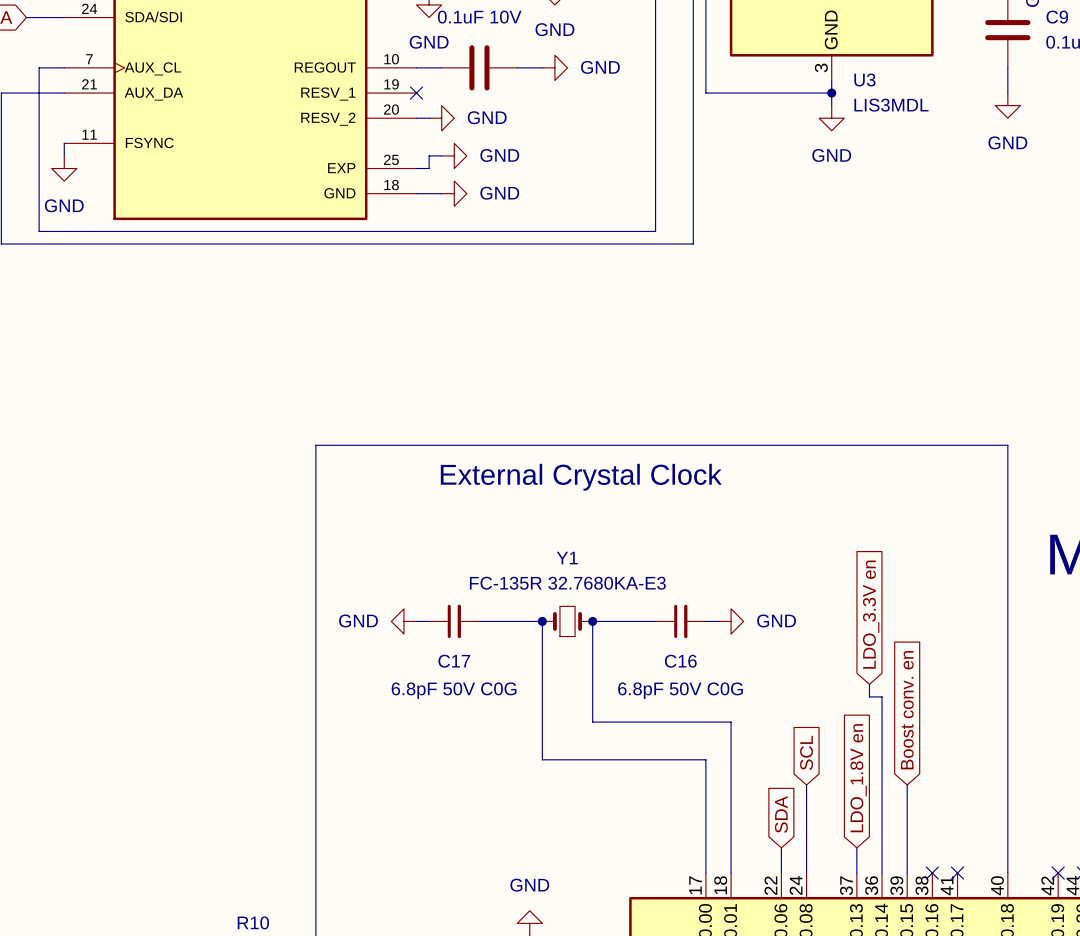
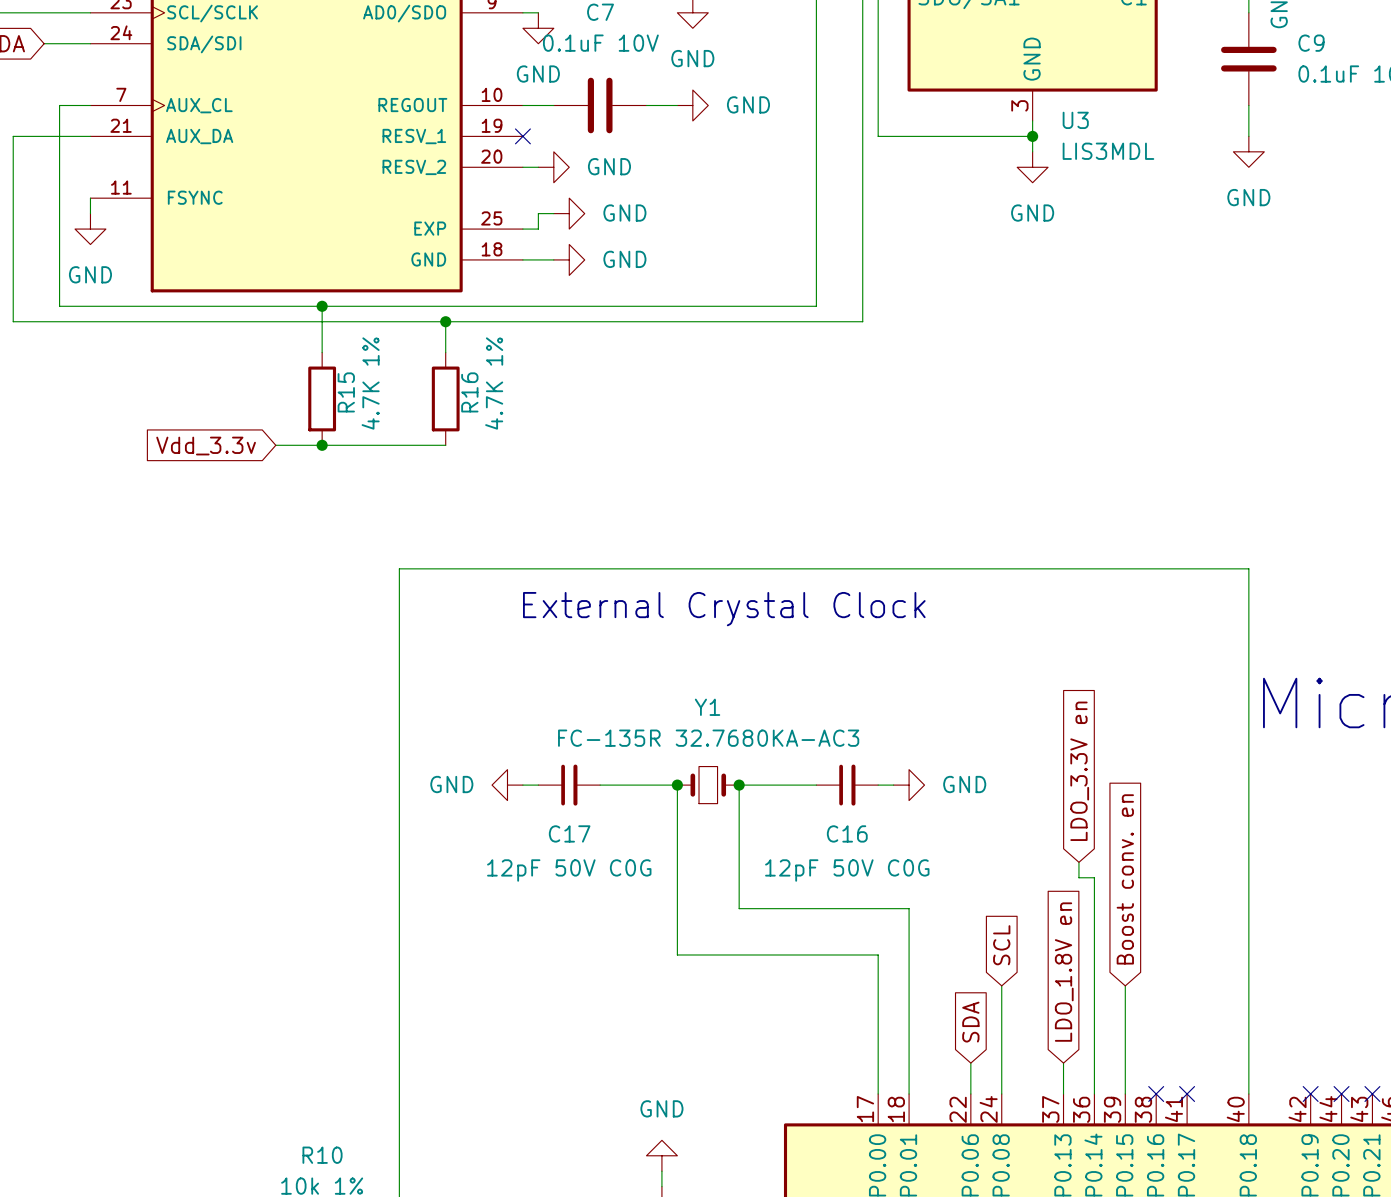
wire: none -> (322, 306) (322, 352)
junction: none -> (322, 306)
wire: none -> (445, 321) (445, 352)
junction: none -> (445, 321)
R15: none -> 4.7K 1% (322, 398)
R16: none -> 4.7K 1% (445, 398)
wire: none -> (275, 445) (445, 445)
junction: none -> (322, 445)
global label: none -> Vdd_3.3v (206, 446)
Y1 value: FC-135R 32.7680KA-E3 (567, 583) -> FC-135R 32.7680KA-AC3 (708, 738)
C17 value: 6.8pF 50V C0G (454, 690) -> 12pF 50V C0G (569, 870)
C16 value: 6.8pF 50V C0G (680, 690) -> 12pF 50V C0G (847, 870)

